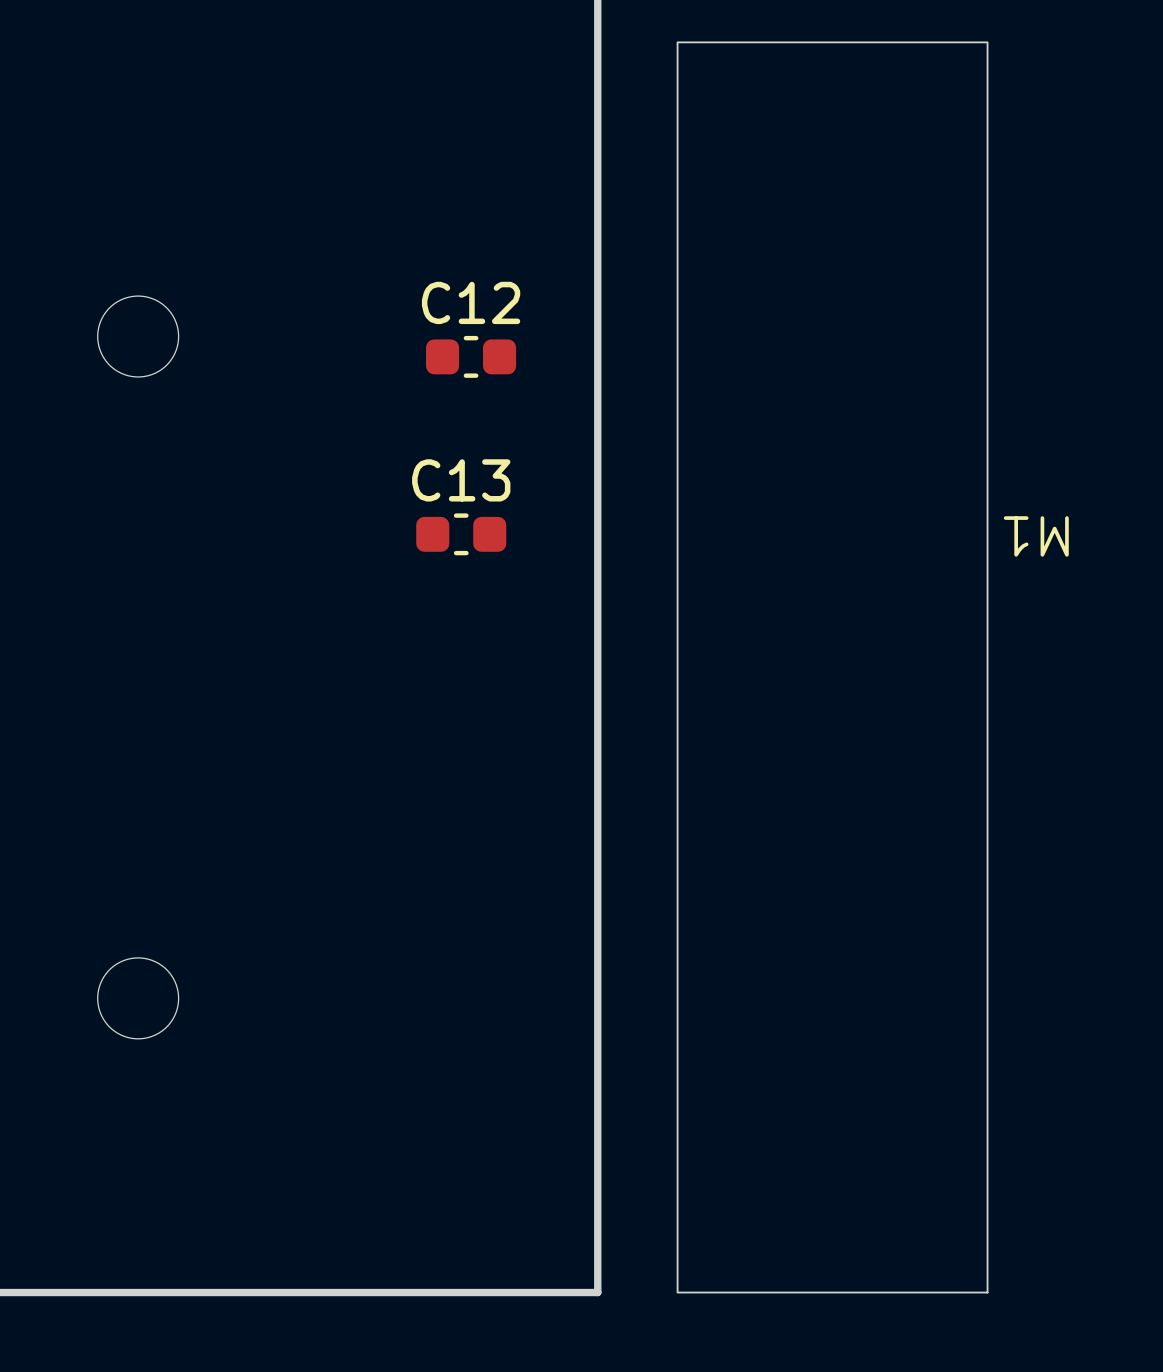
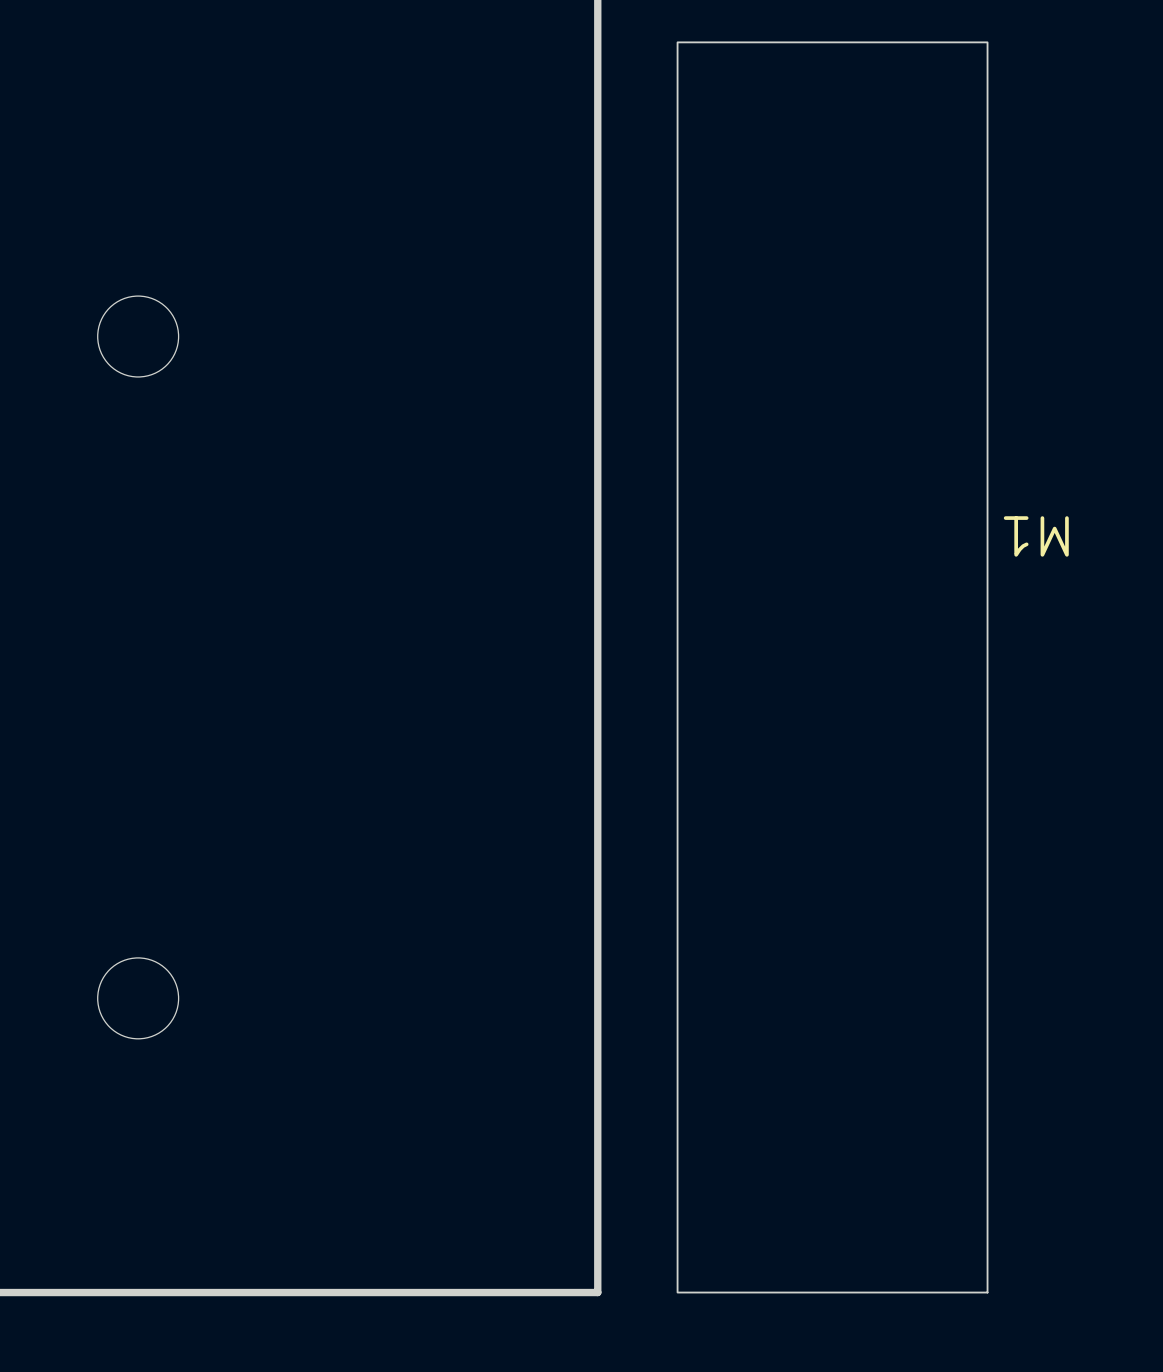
C12: (471, 356) -> none
C13: (461, 534) -> none

